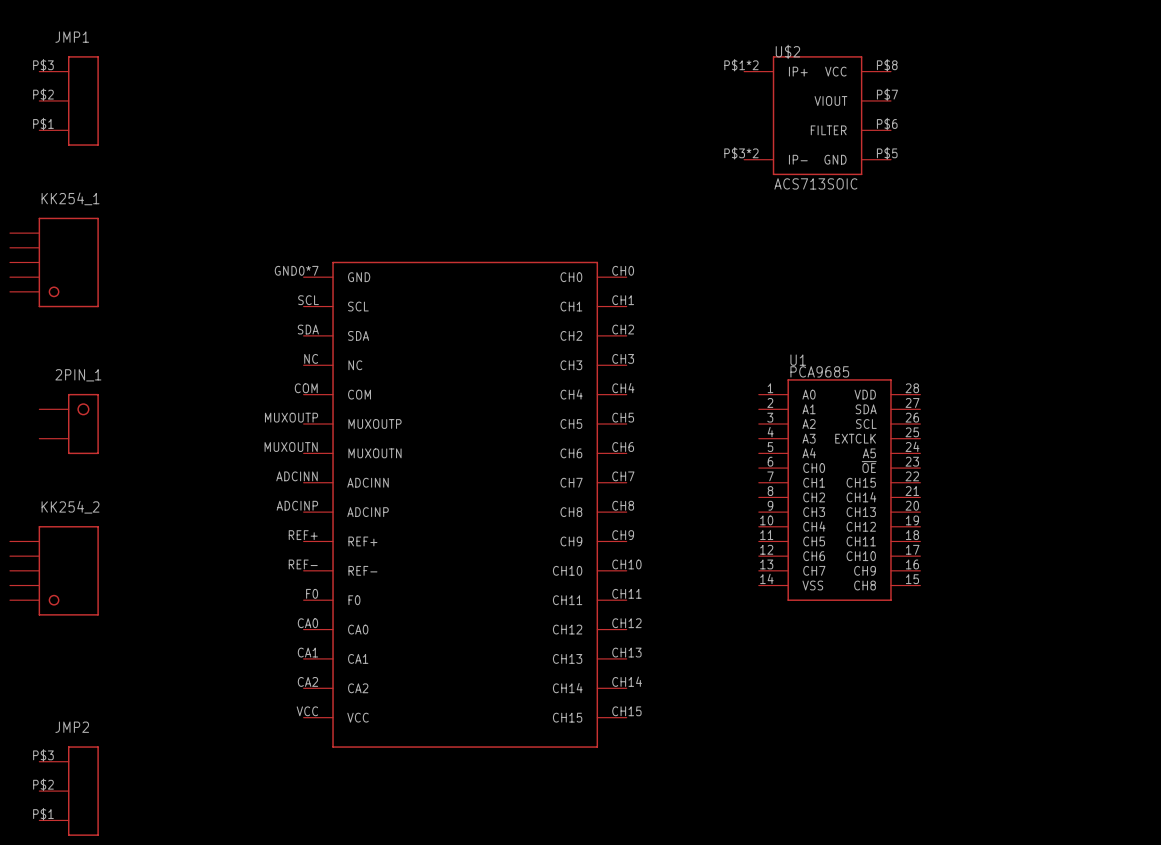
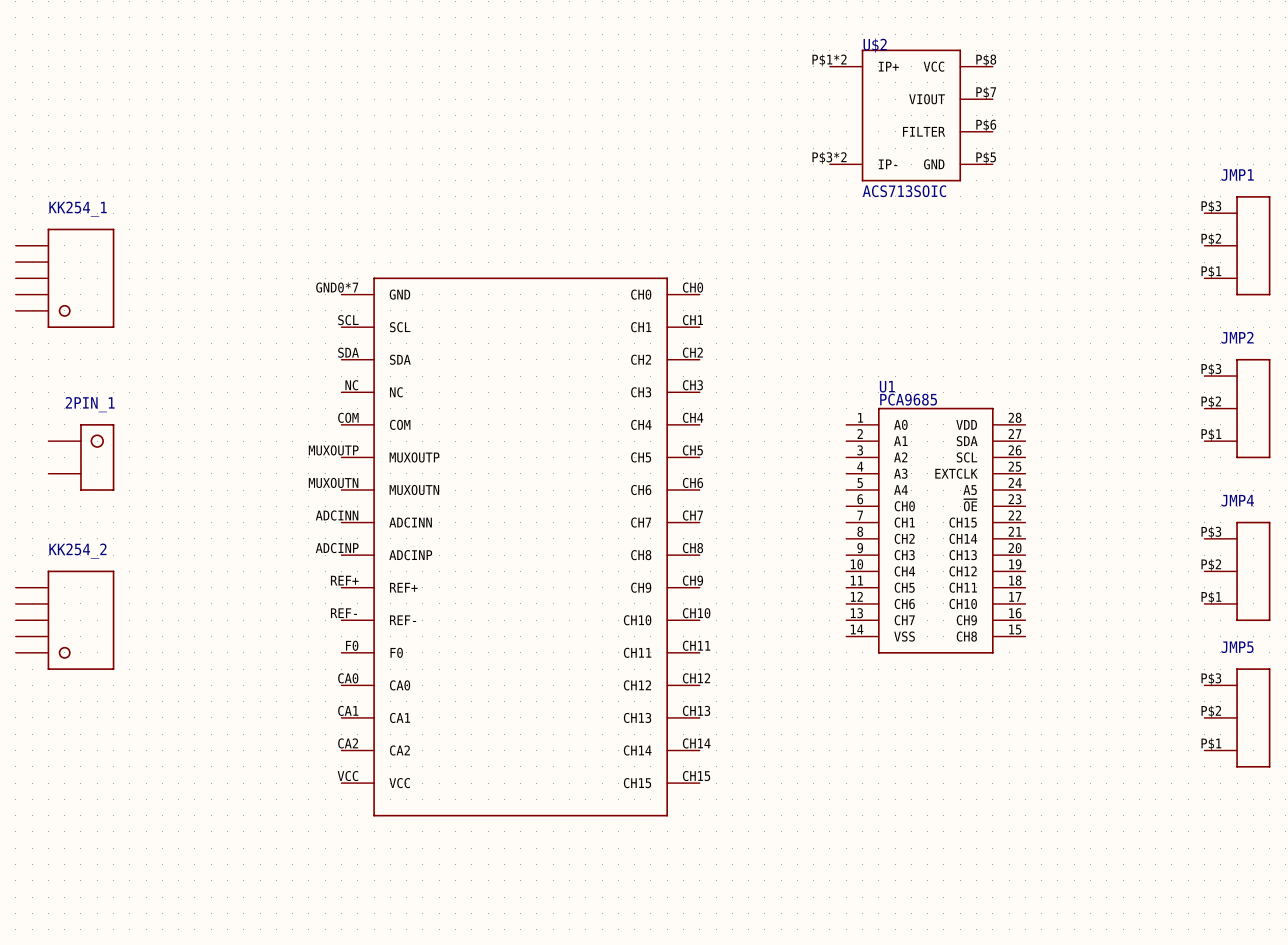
JMP1 position: (69, 100) -> (1237, 245)
JMP4: none -> (1237, 571)
JMP5: none -> (1237, 717)
JMP2 position: (69, 791) -> (1237, 408)

